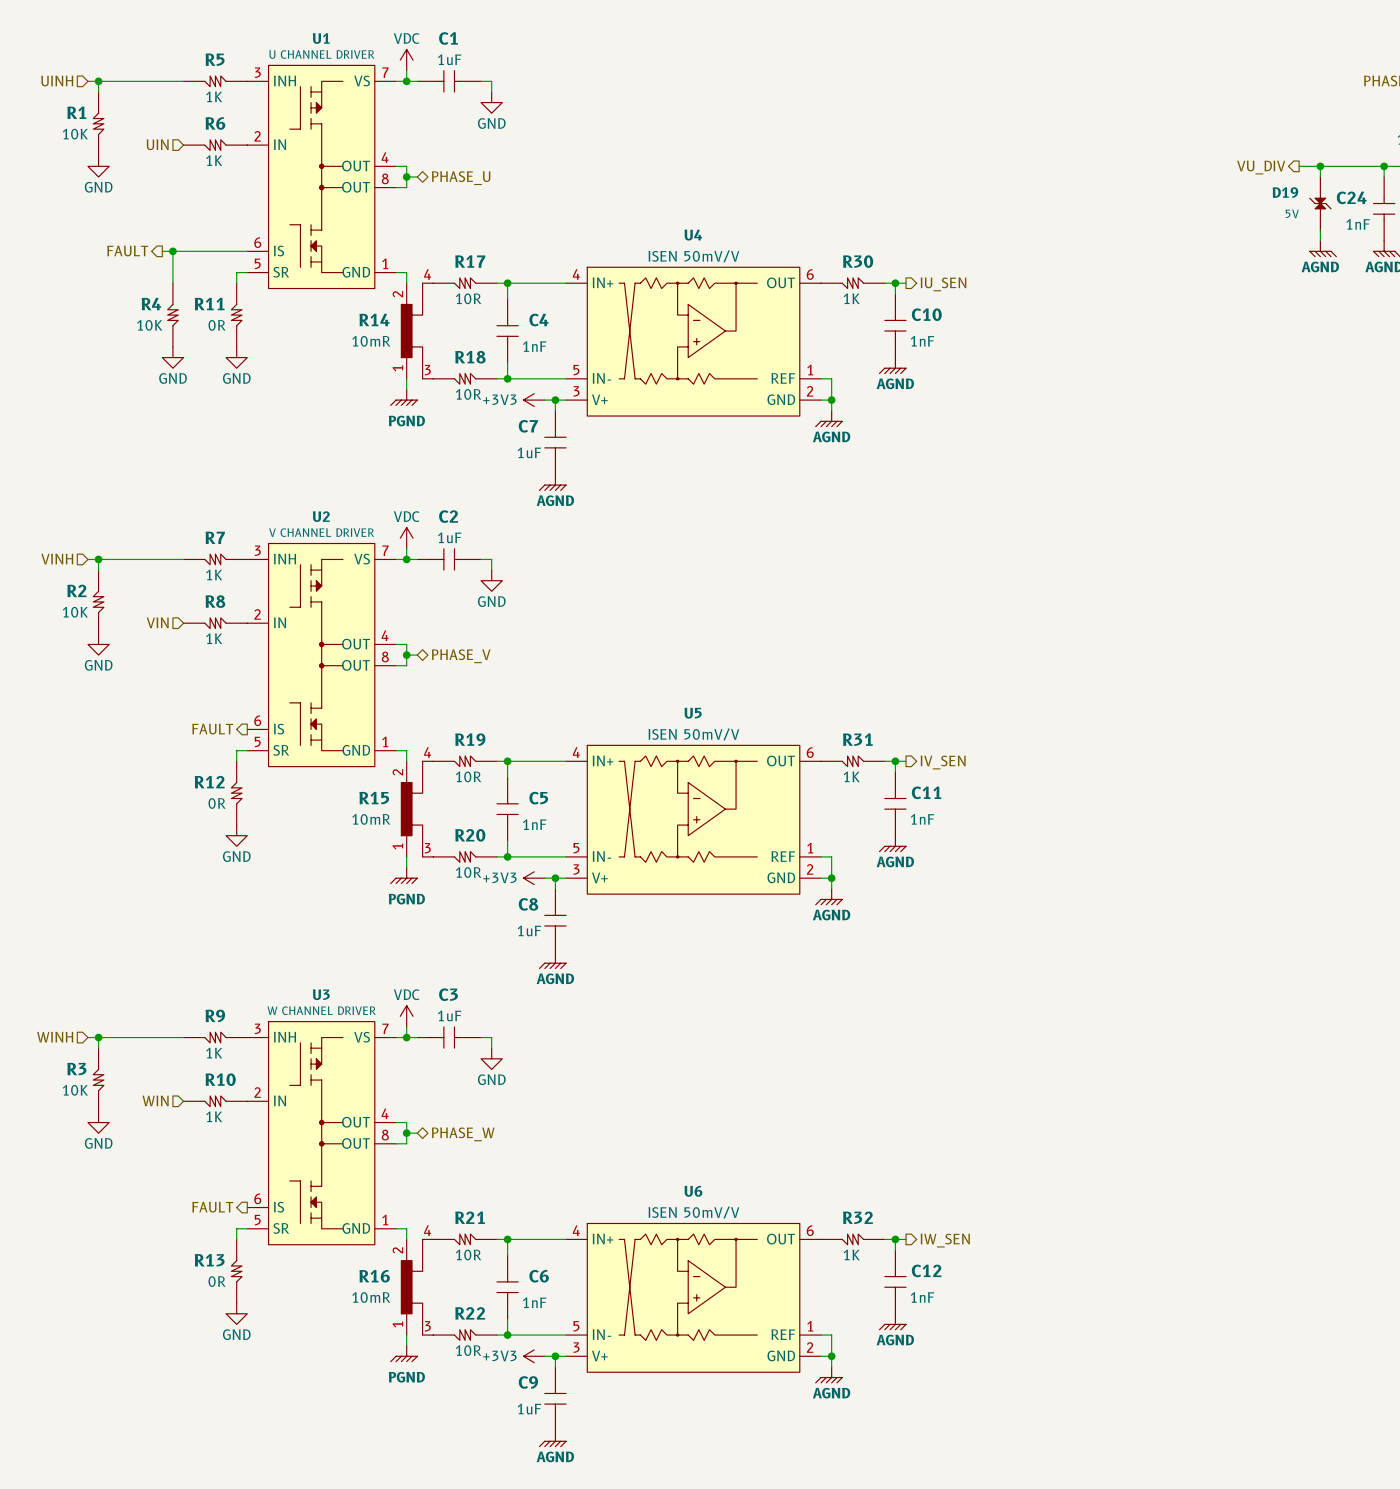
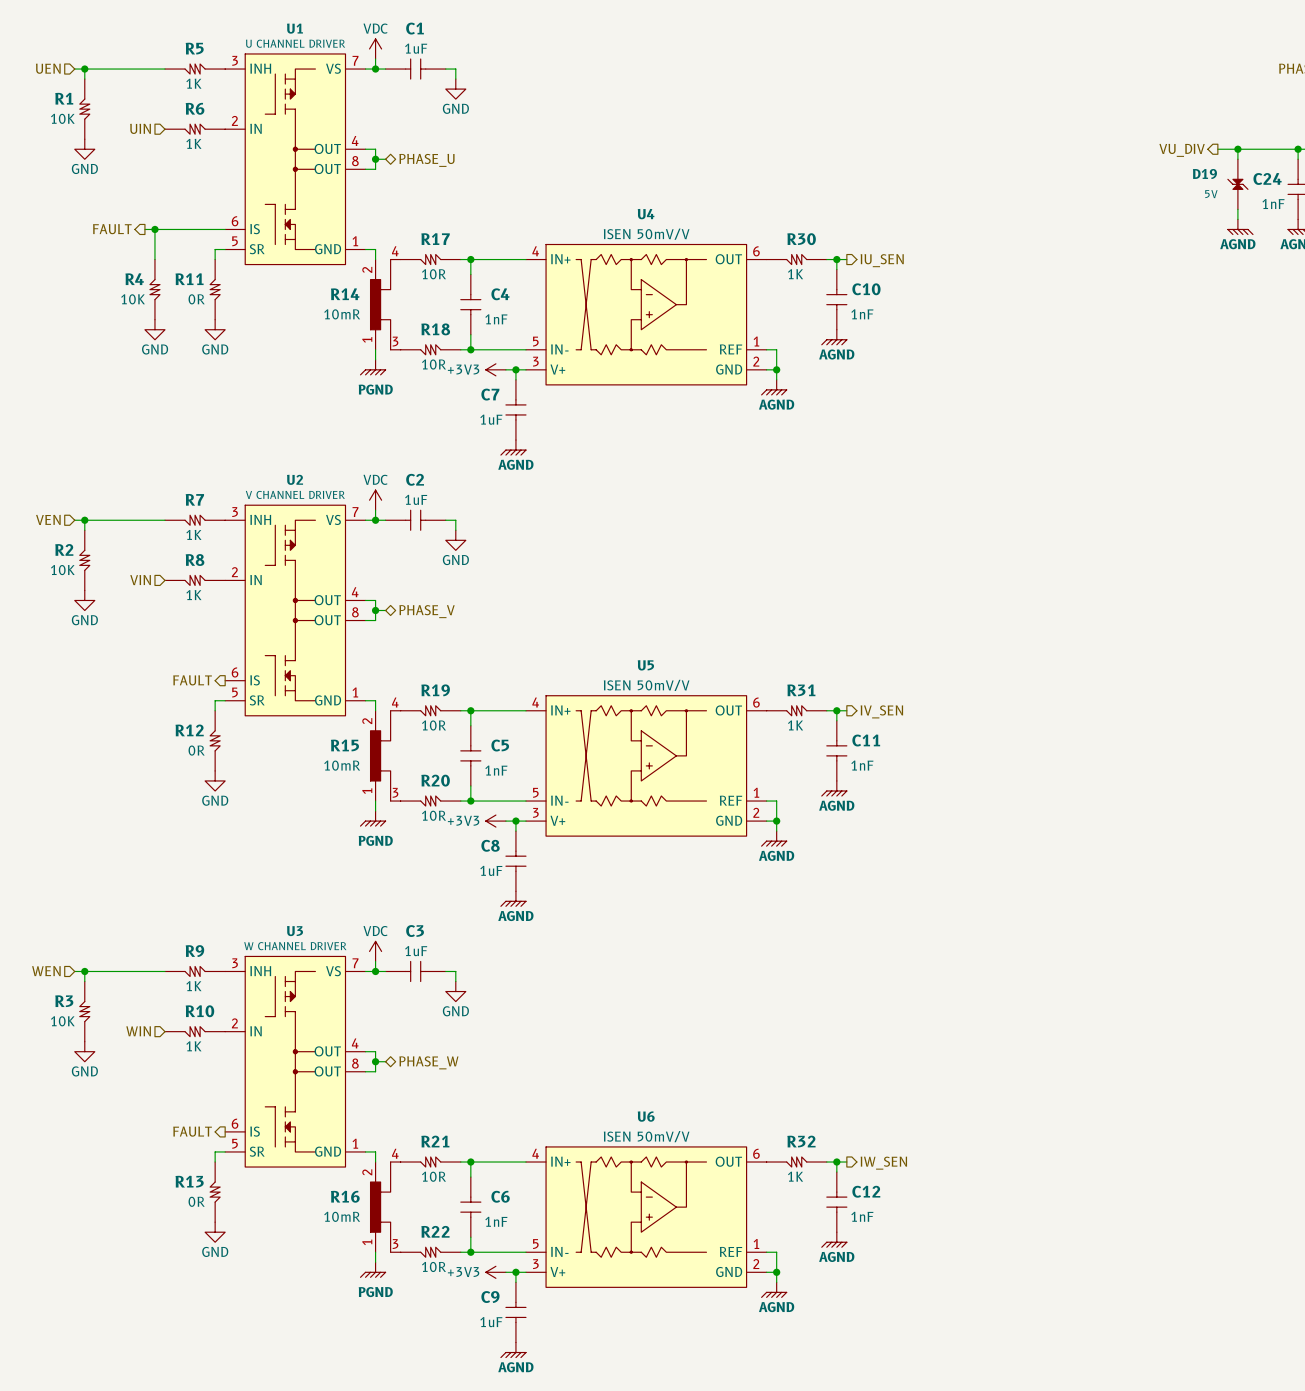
hierarchical label: UINH (57, 81) -> UEN (48, 68)
hierarchical label: VINH (57, 559) -> VEN (48, 519)
hierarchical label: WINH (55, 1037) -> WEN (46, 971)

